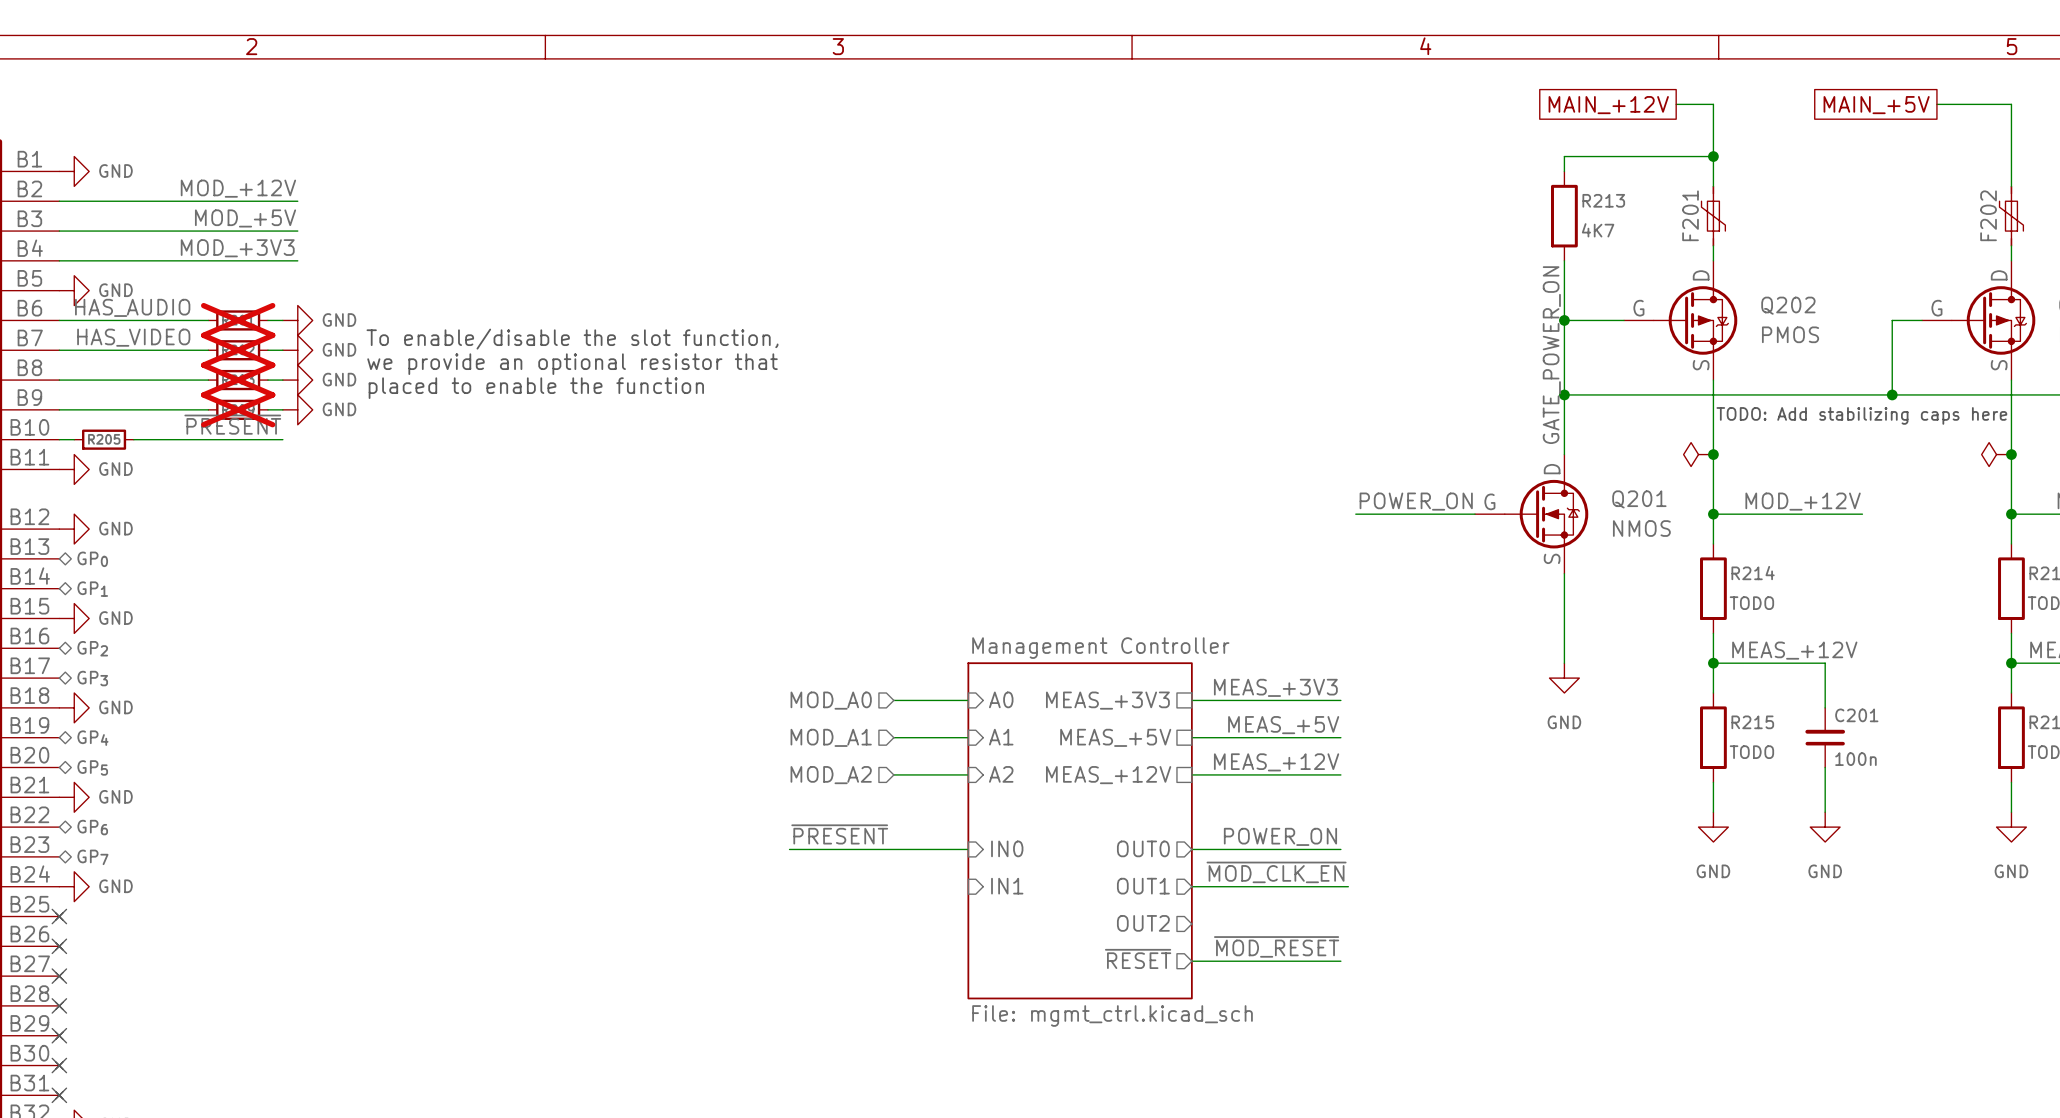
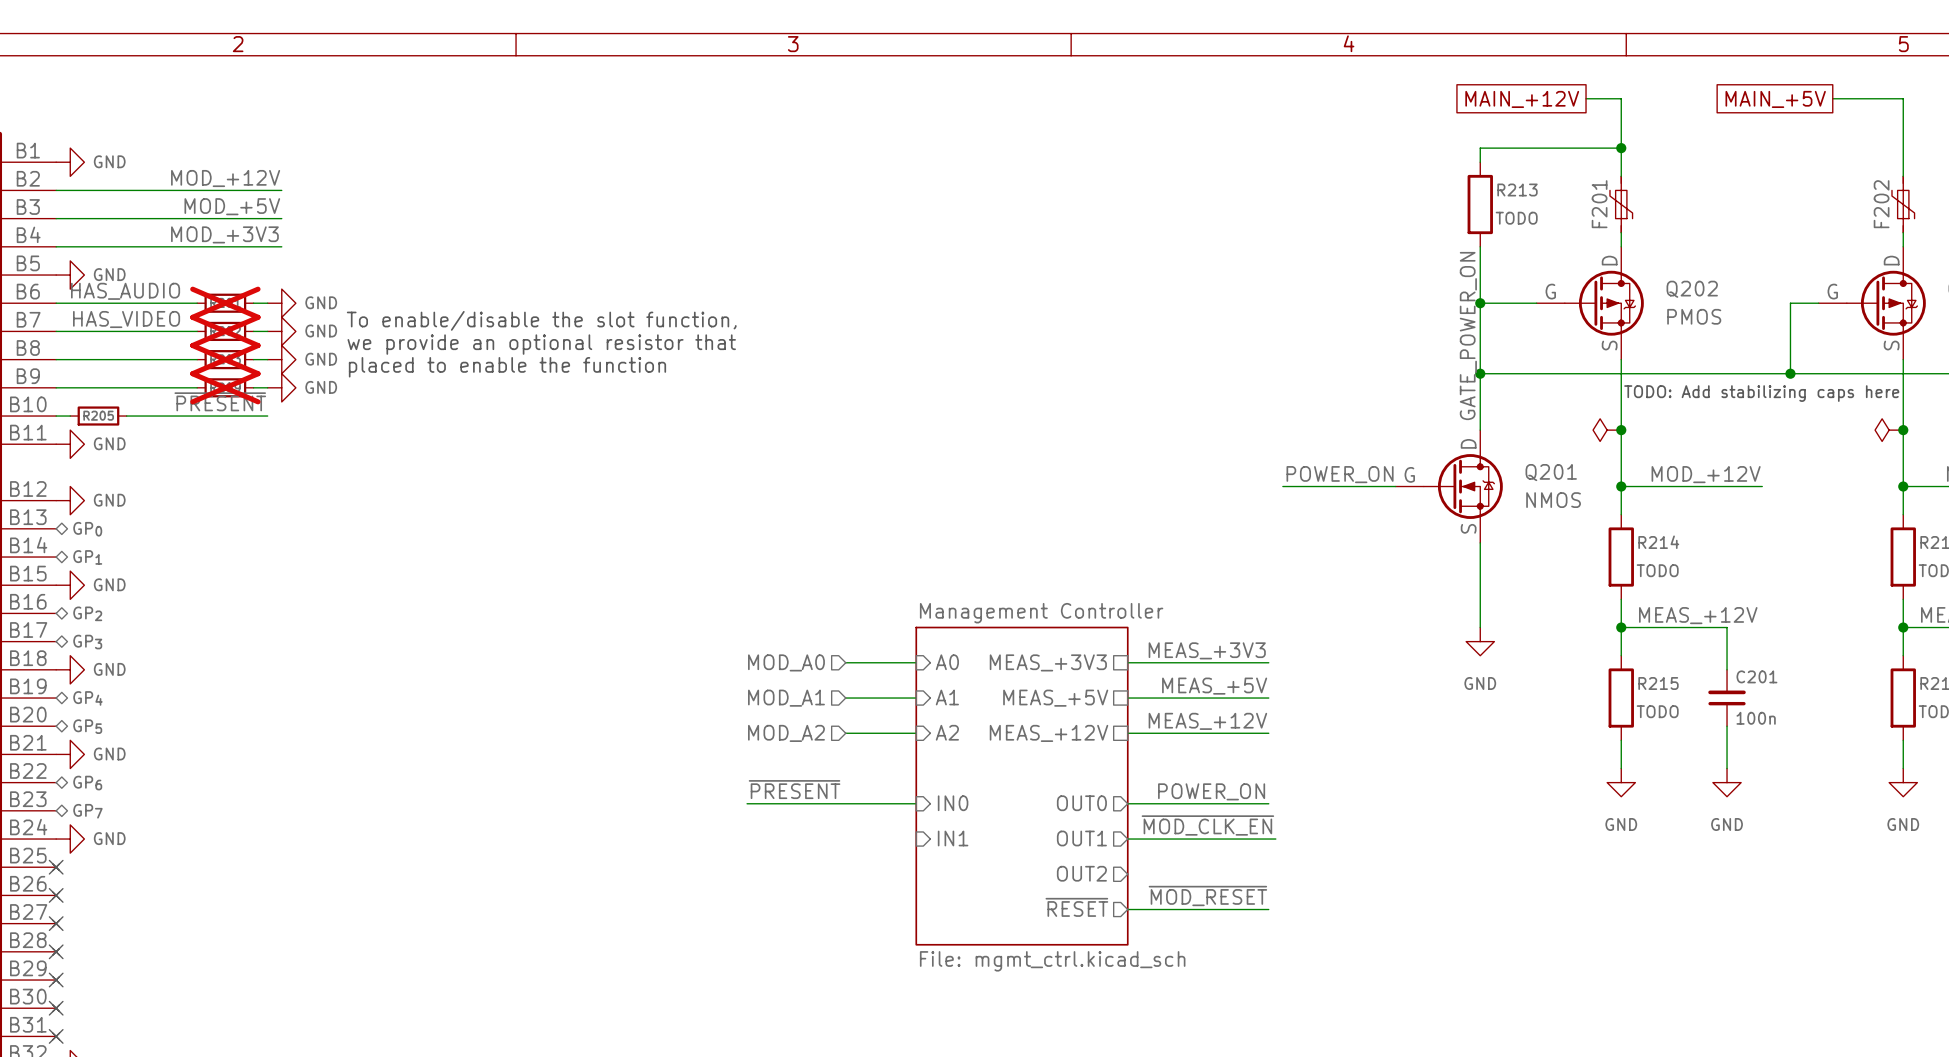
R213 value: 4K7 (1598, 230) -> TODO (1516, 218)

